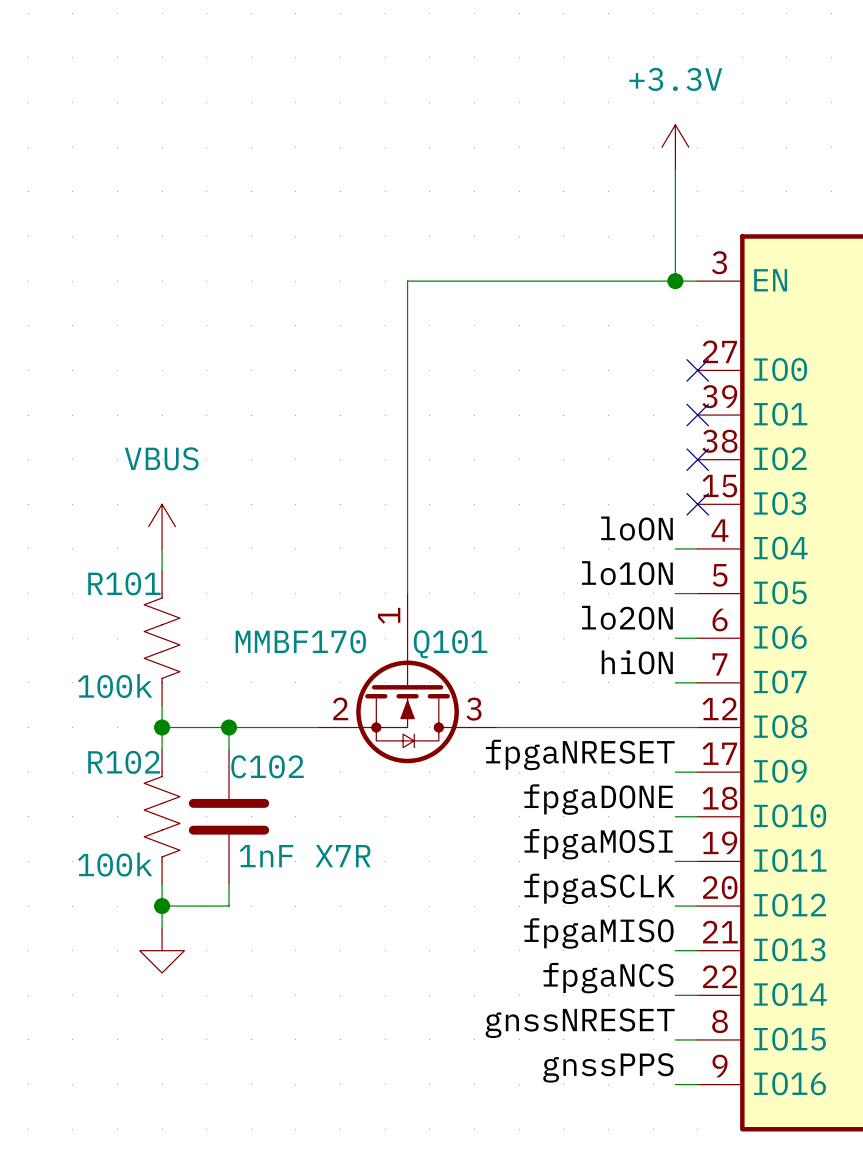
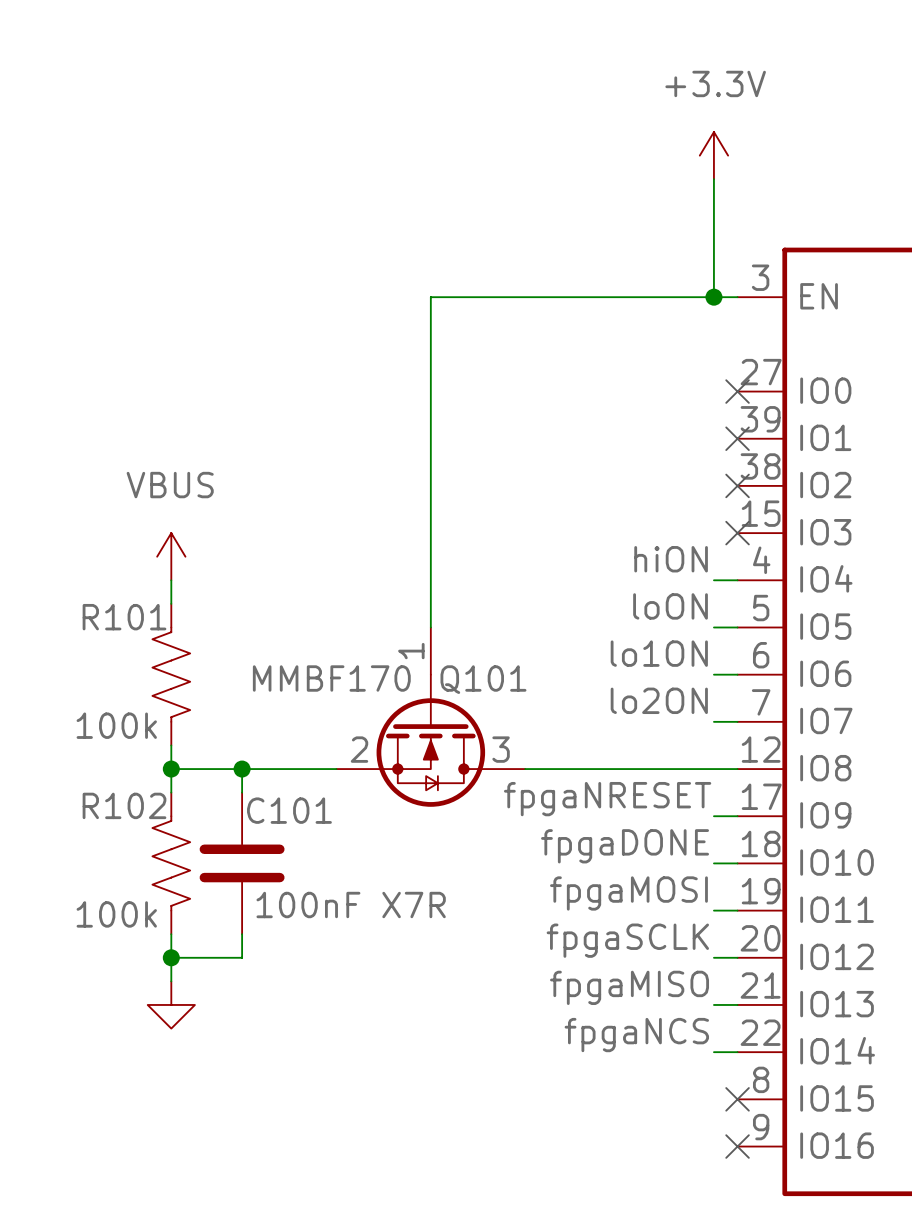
label: loON (637, 528) -> hiON (671, 559)
label: lo1ON (627, 573) -> loON (670, 606)
label: lo2ON (627, 617) -> lo1ON (659, 653)
label: hiON (637, 662) -> lo2ON (659, 700)
C102 name: C102 (267, 766) -> C101 (289, 810)
C102 value: 1nF X7R (305, 856) -> 100nF X7R (351, 905)
label: gnssNRESET (580, 1023) -> none
wire: (675, 1039) (697, 1039) -> none
no-connect mark: none -> (737, 1099)
label: gnssPPS (608, 1067) -> none
wire: (675, 1084) (697, 1084) -> none
no-connect mark: none -> (737, 1146)

